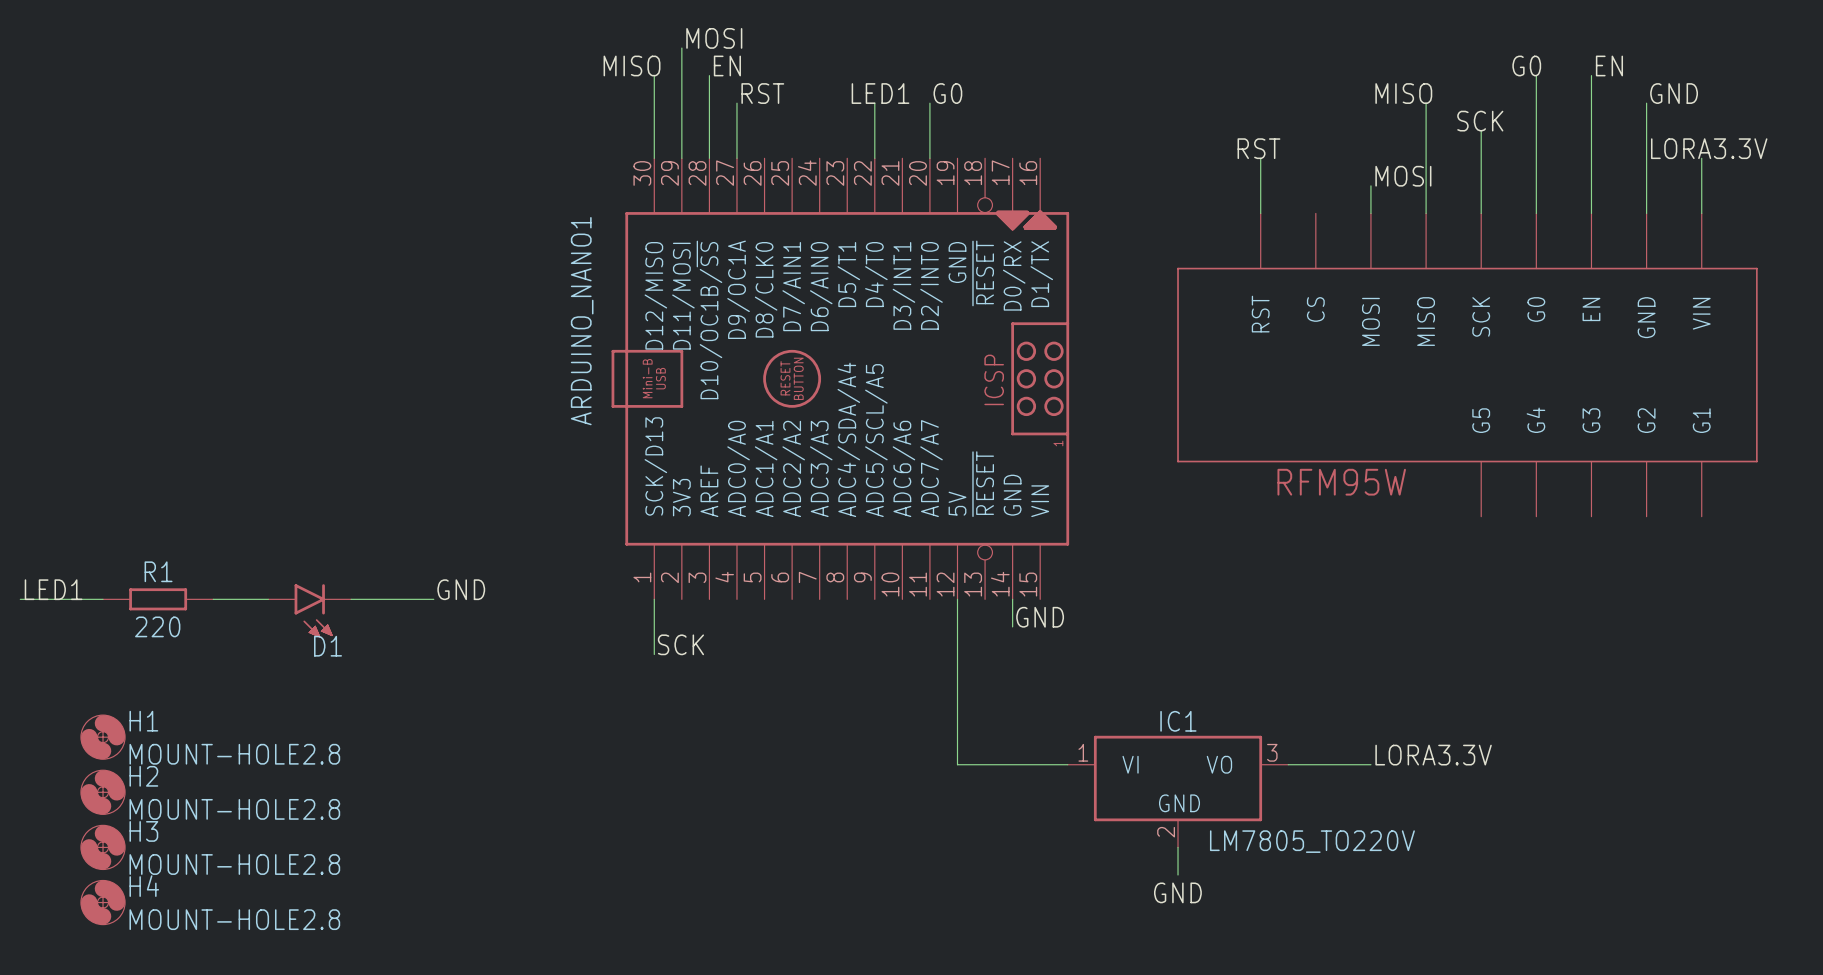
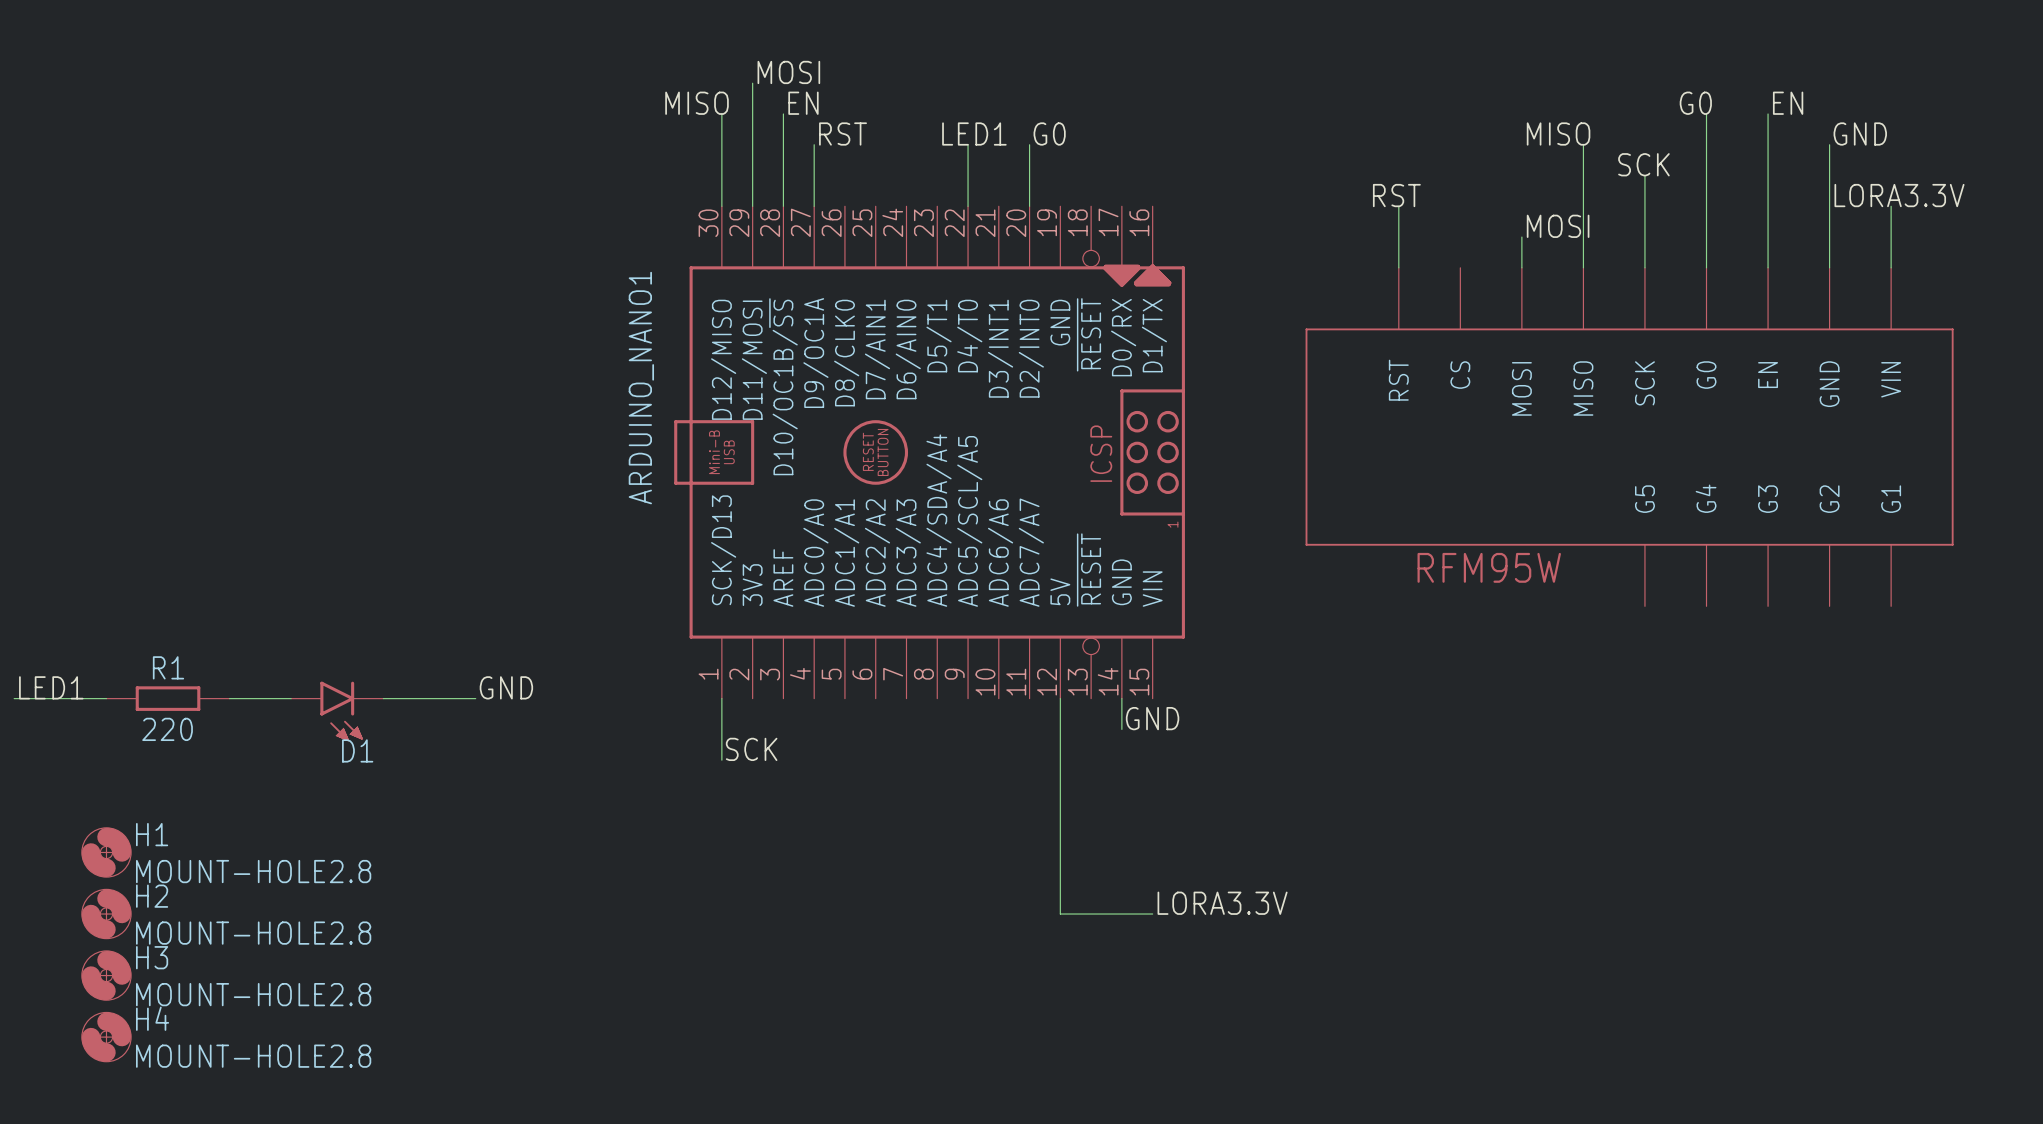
label: LORA3.3V (1433, 755) -> none
wire: (957, 764) (1067, 764) -> (1060, 883) (1060, 914) (1152, 914)
wire: (1288, 764) (1370, 764) -> none
label: none -> LORA3.3V (1222, 903)
IC1: LM7805_TO220V (1178, 791) -> none
wire: (1178, 847) (1178, 874) -> none
label: GND (1177, 892) -> none

